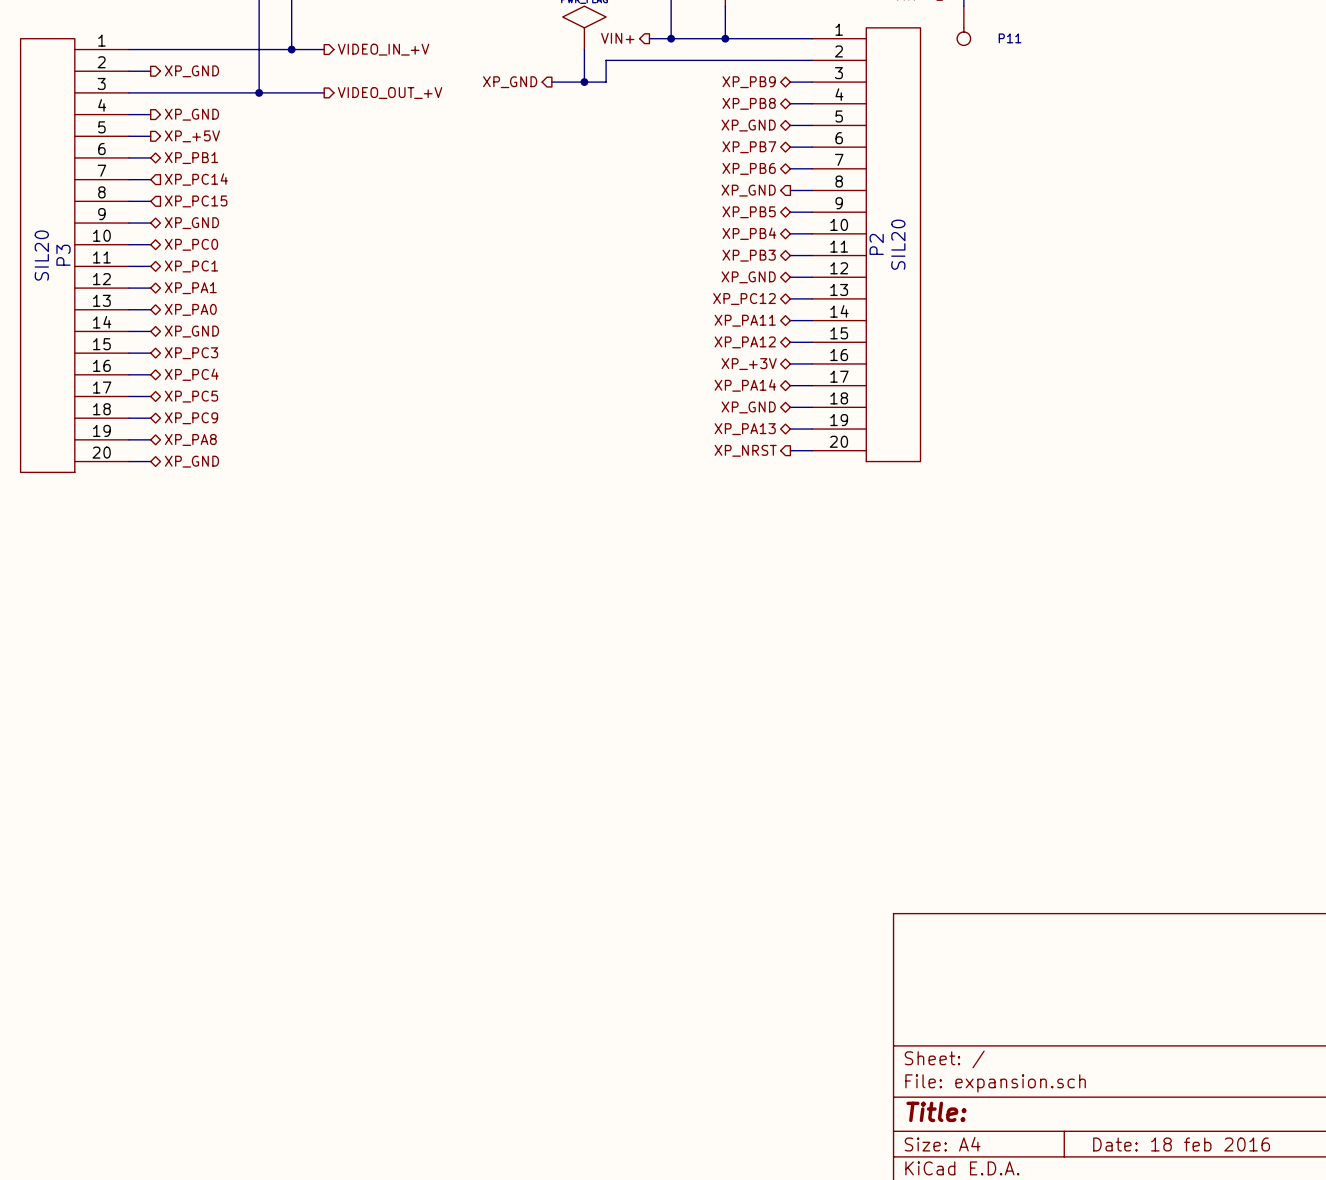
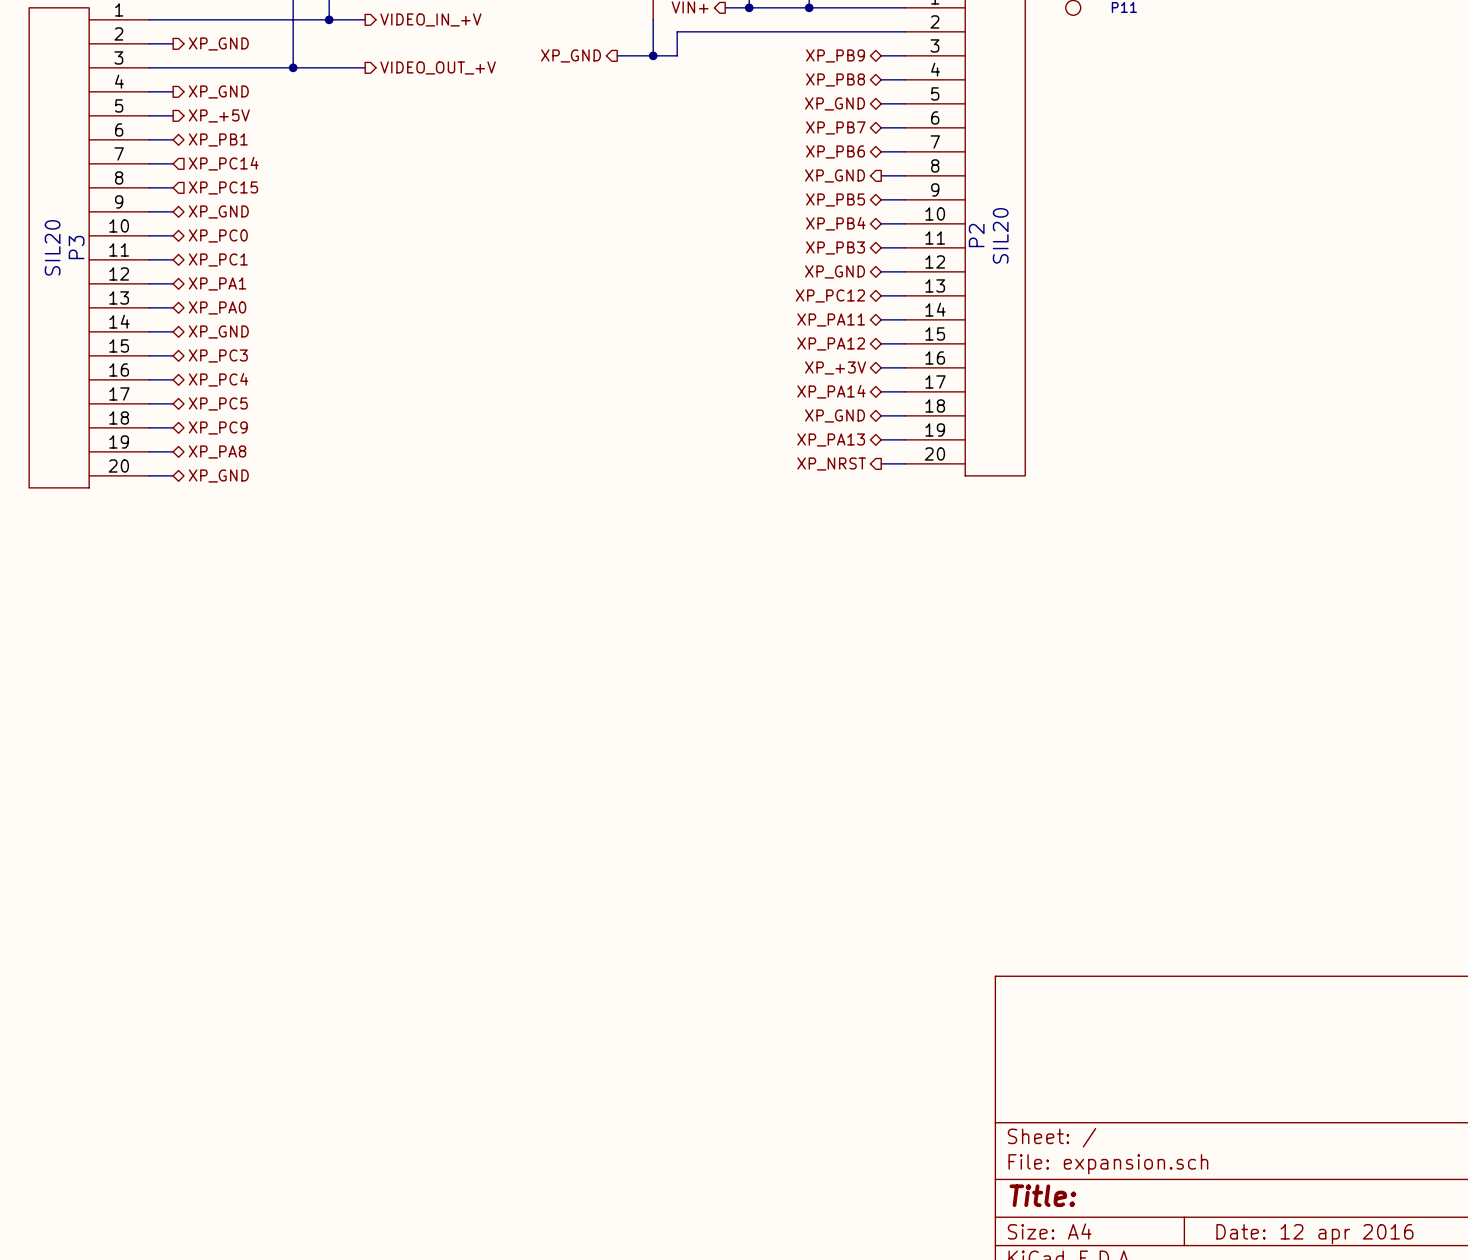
title block: Date: 18 feb 2016 (1181, 1144) -> Date: 12 apr 2016 (1314, 1234)

